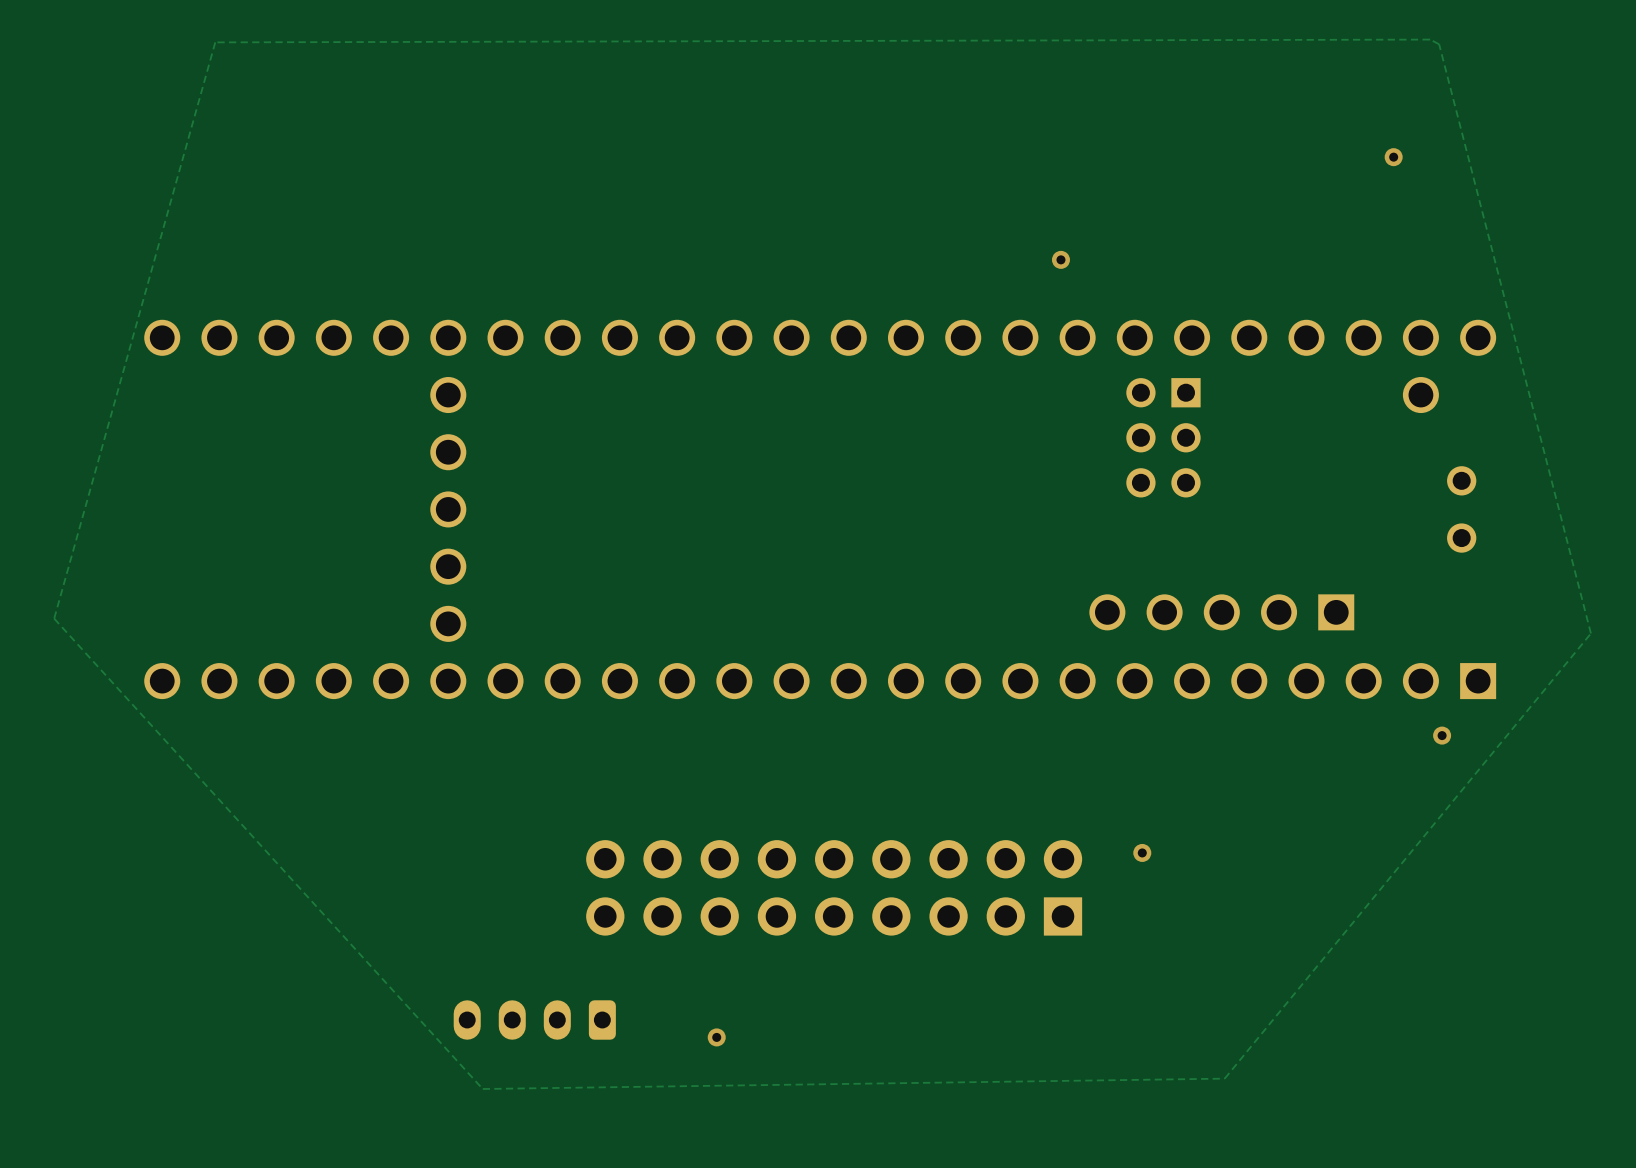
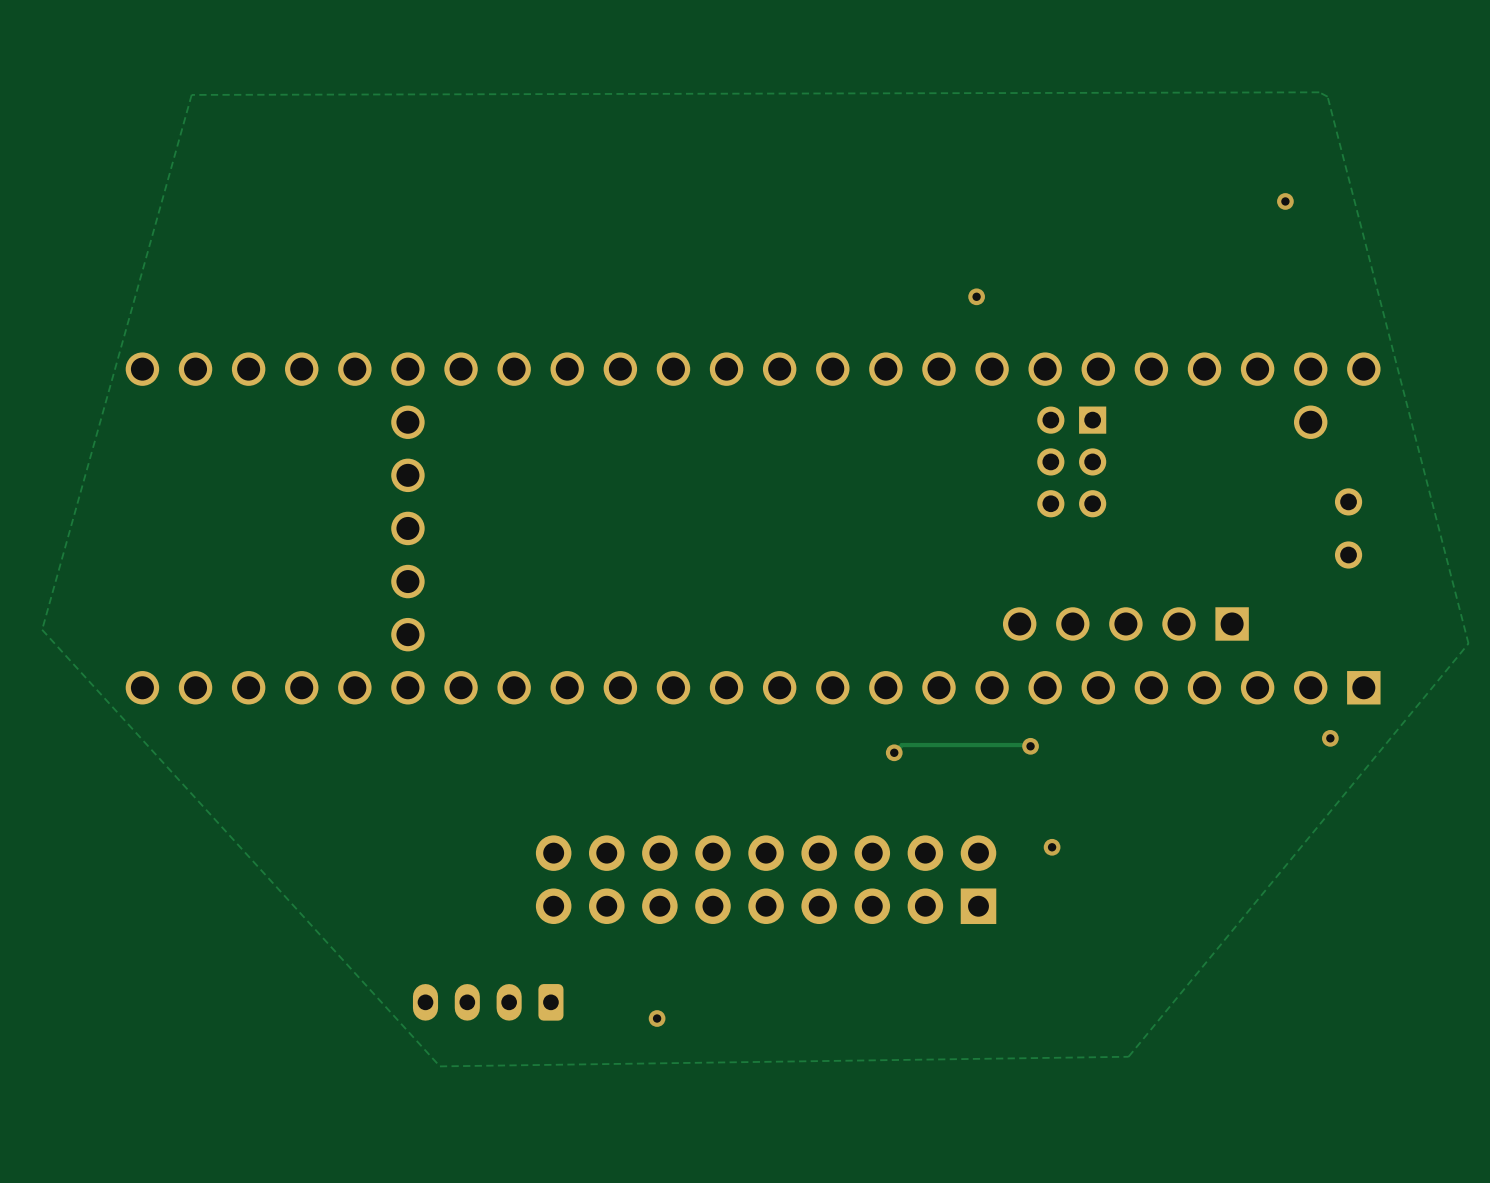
track: none -> (1030, 746) (901, 745) (894, 752)
via: none -> (1030, 746)
via: none -> (894, 752)

